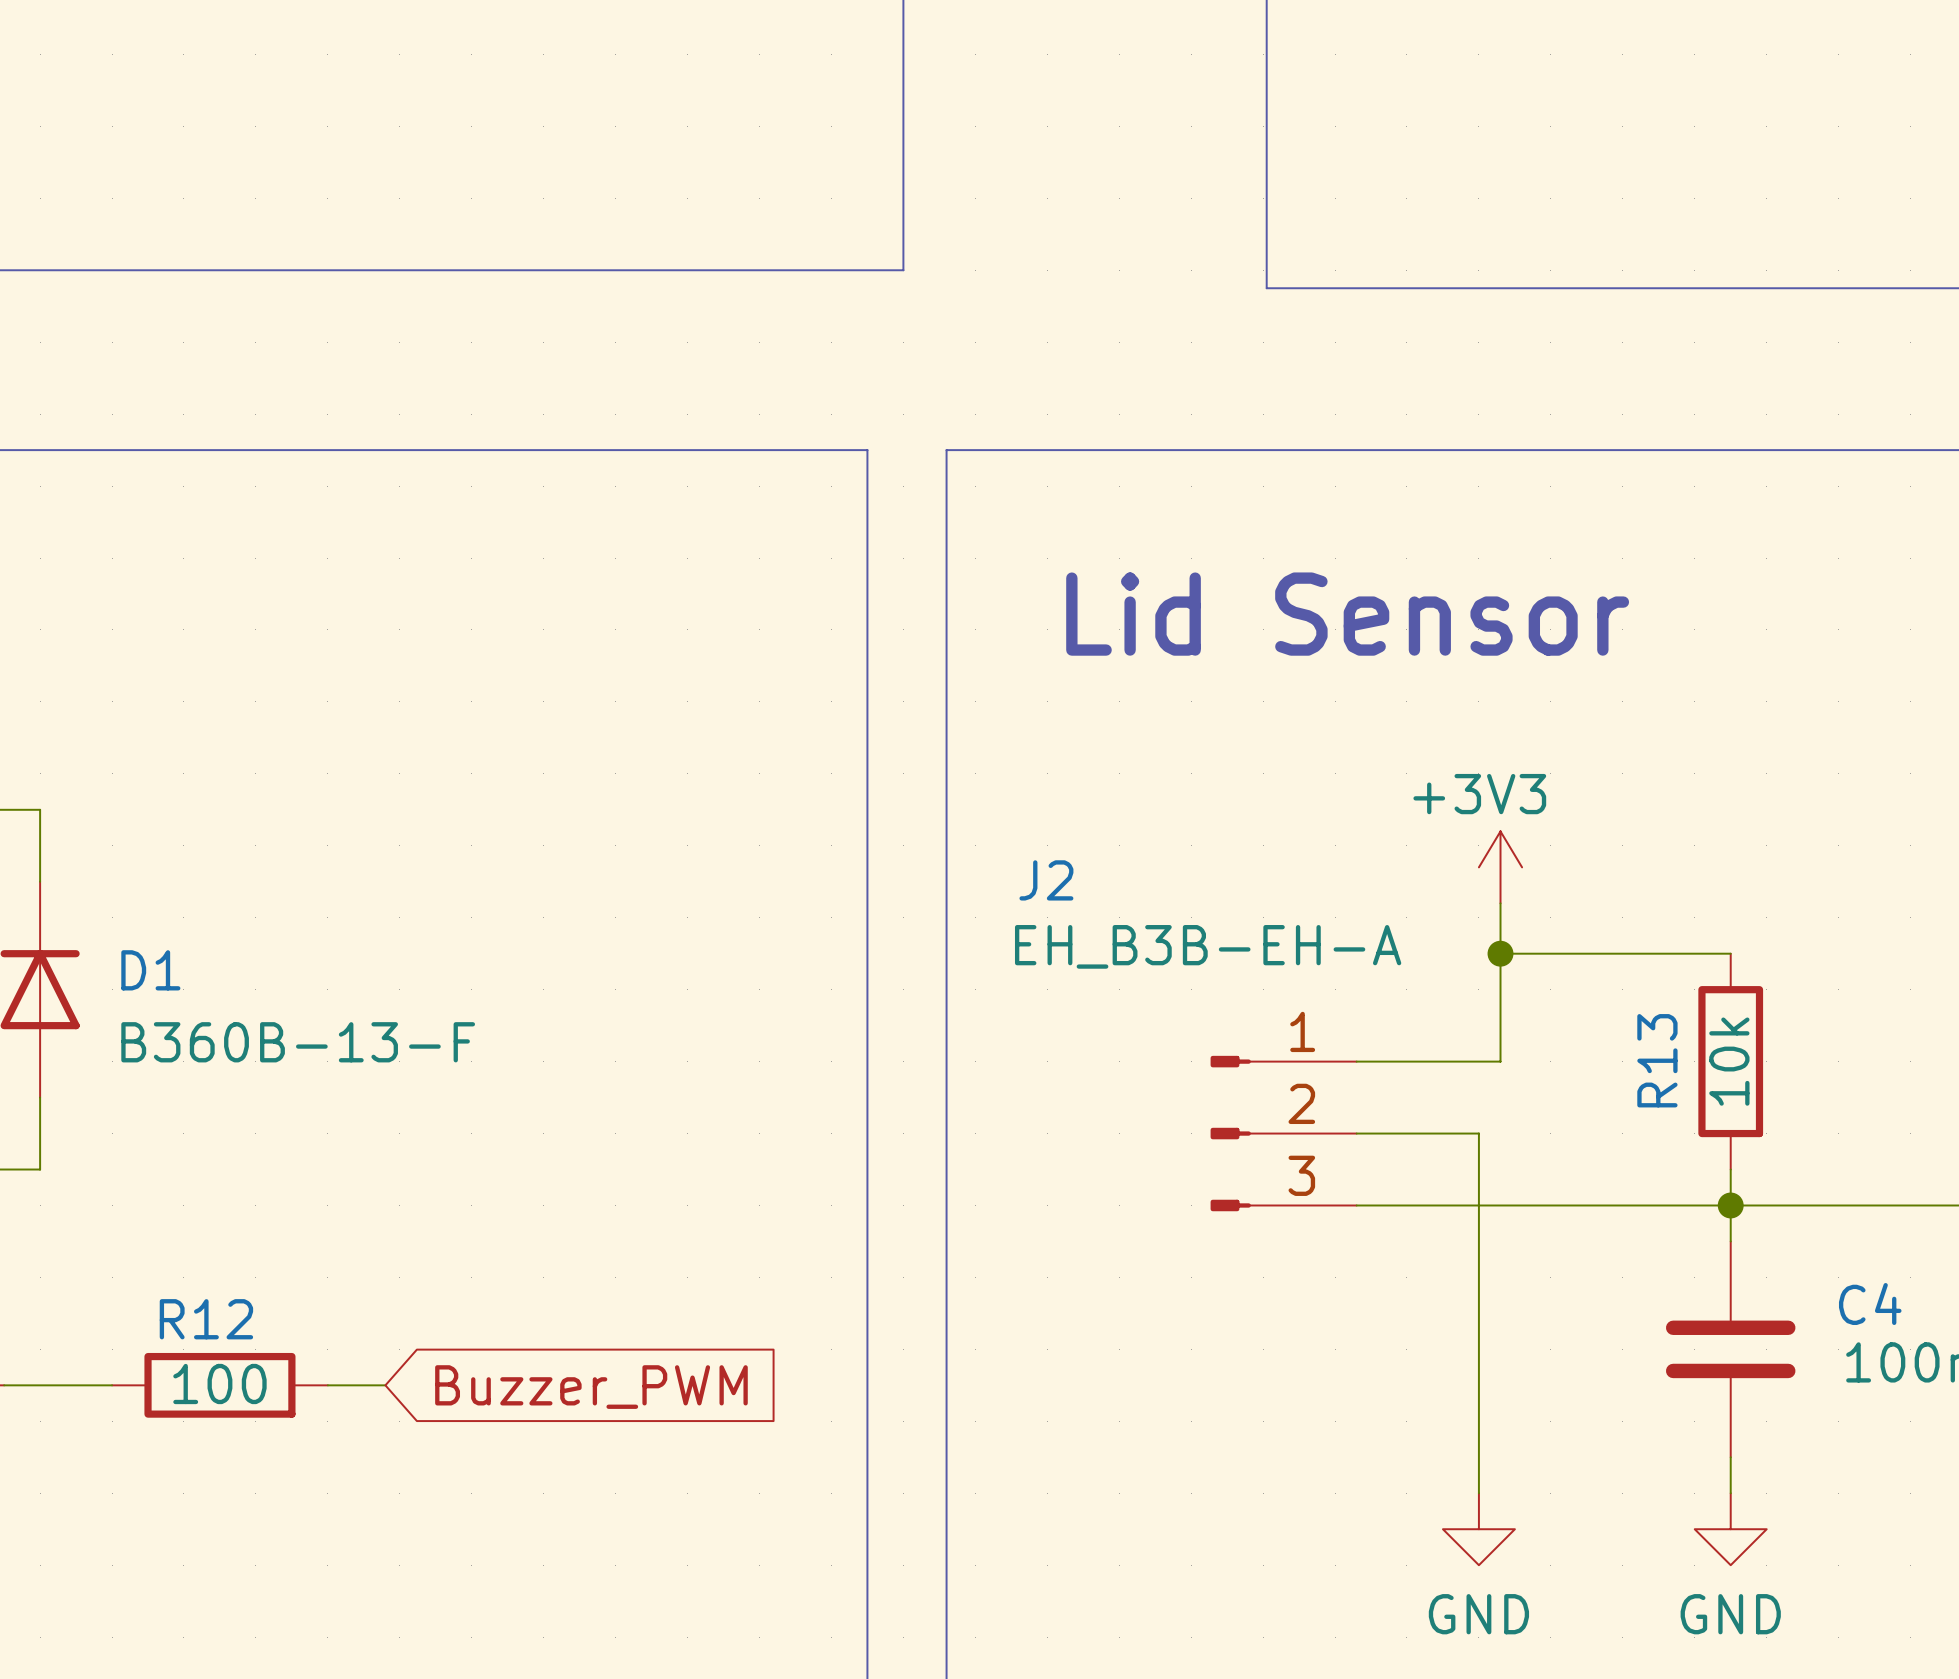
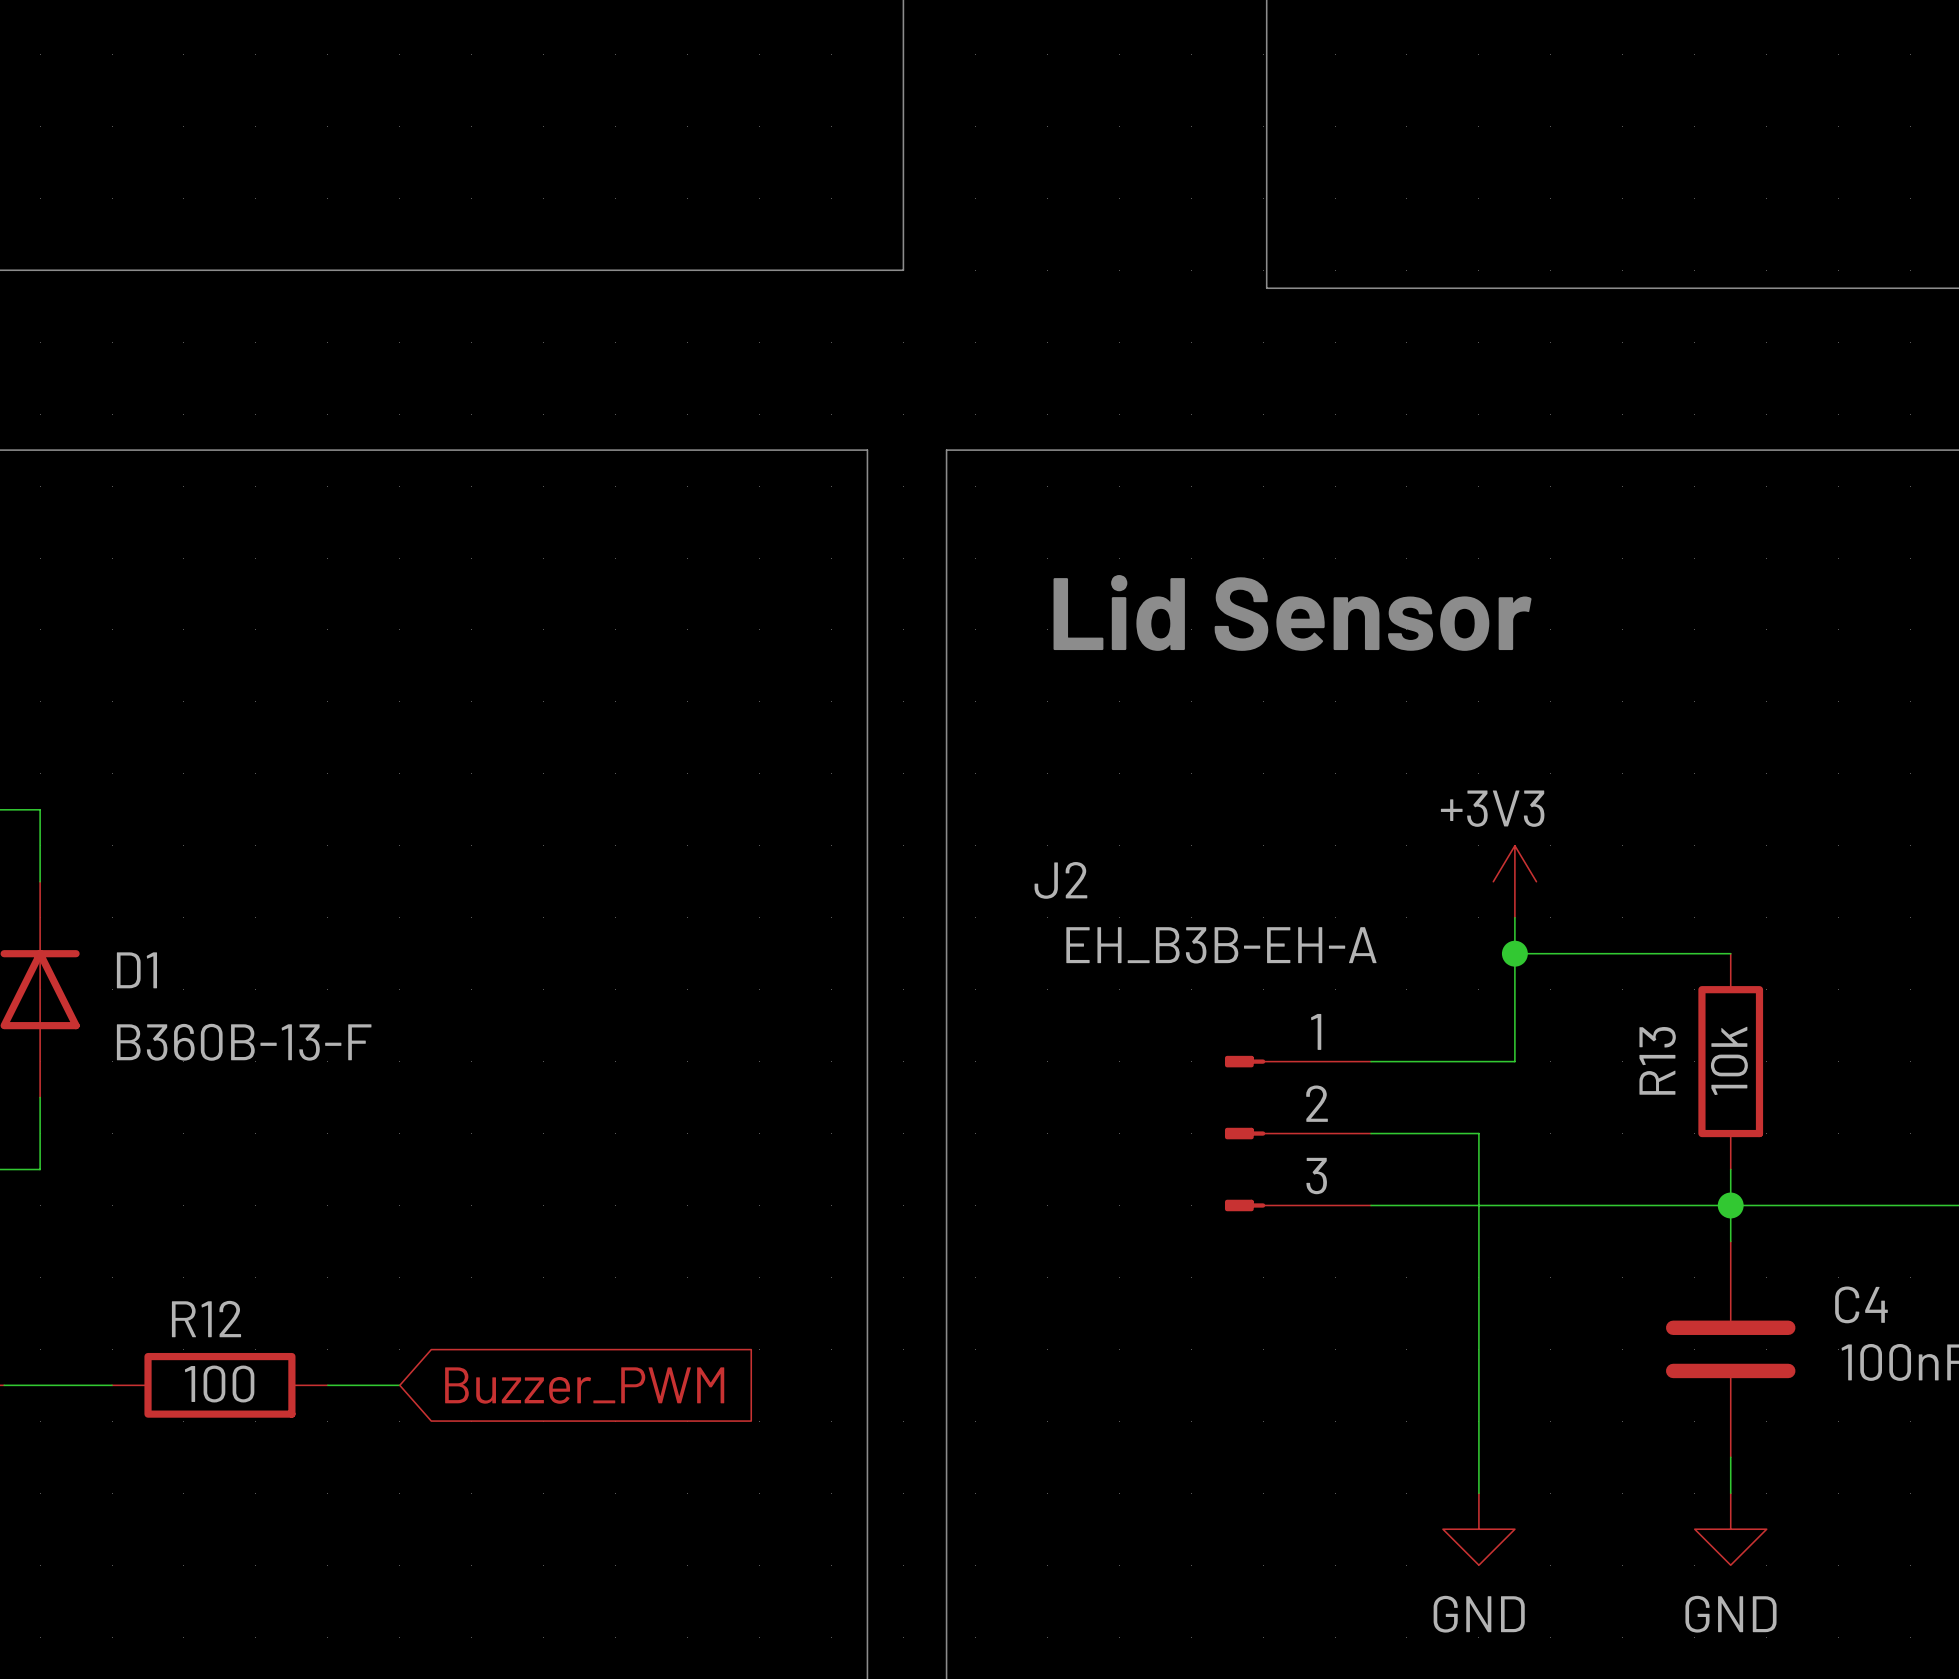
power symbol position: +3V3 (1500, 867) -> +3V3 (1514, 881)
wire: (1500, 903) (1500, 1061) -> (1514, 917) (1514, 1061) (1500, 1061)
junction position: (1500, 953) -> (1514, 953)
J2 position: (1283, 1133) -> (1297, 1133)
wire: none -> (385, 1385) (399, 1385)
global label position: Buzzer_PWM (591, 1387) -> Buzzer_PWM (584, 1385)

